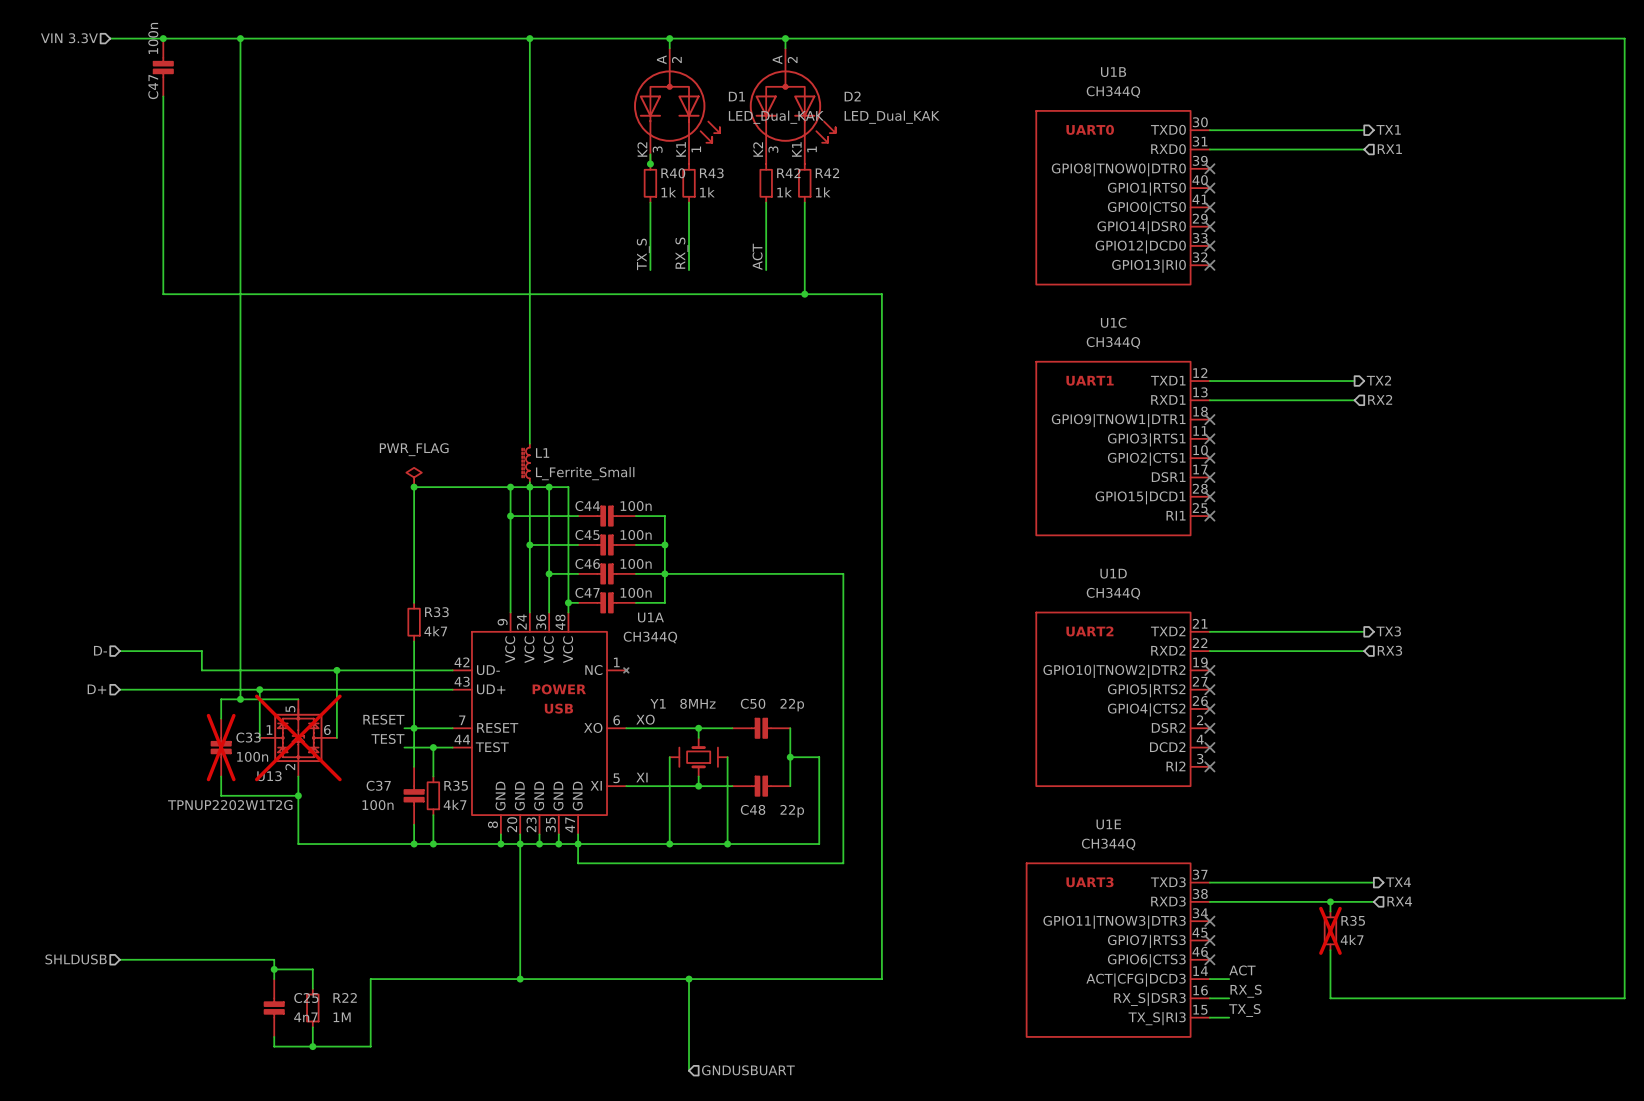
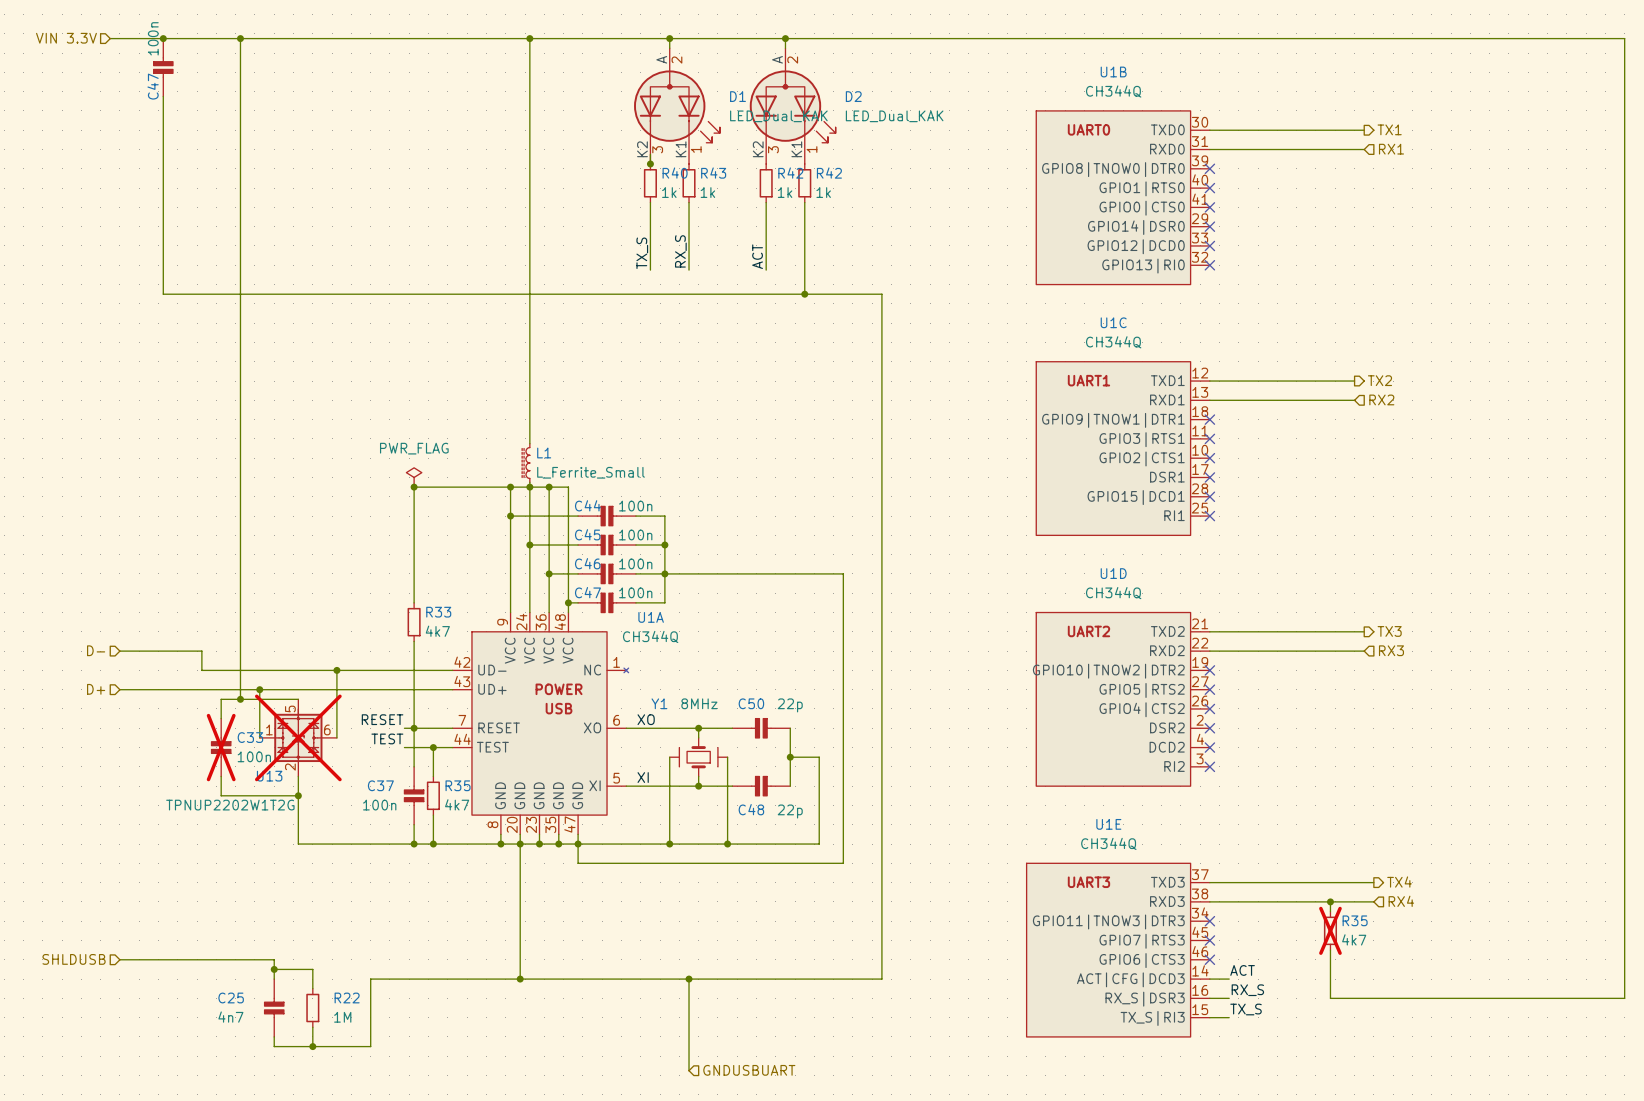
C25 name position: C25 (306, 998) -> C25 (231, 998)
C25 value position: 4n7 (305, 1017) -> 4n7 (230, 1017)

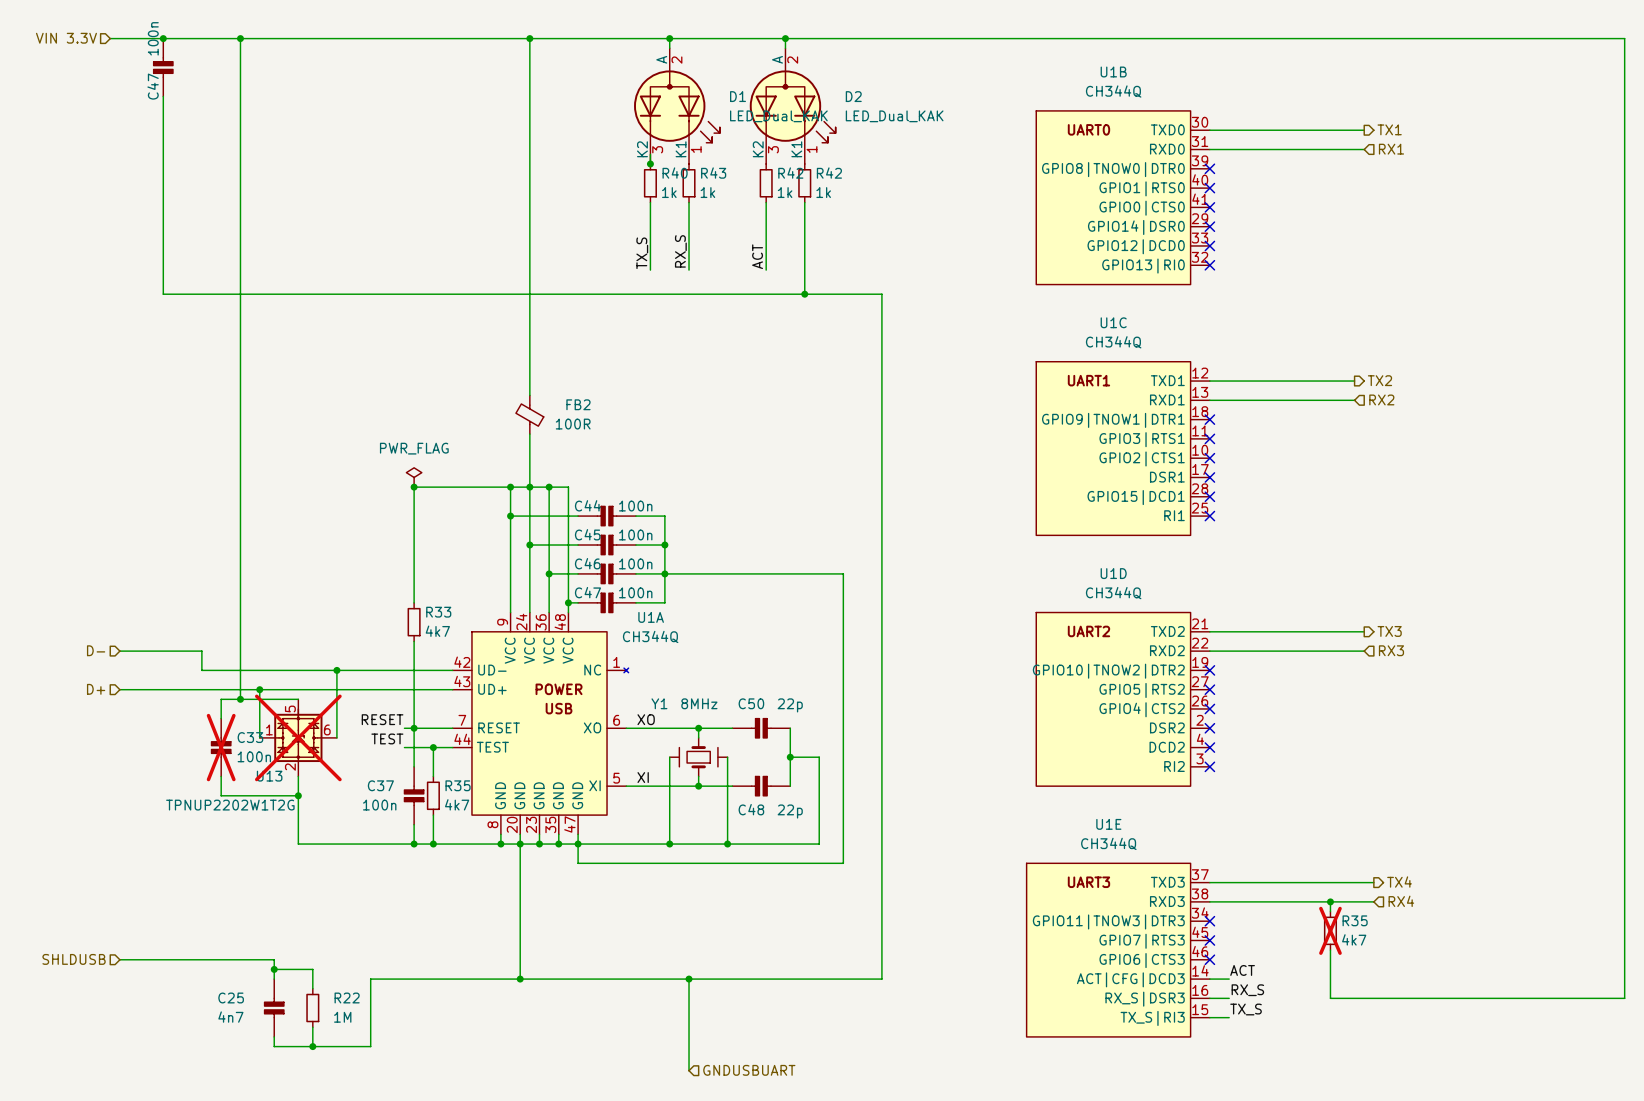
FB2: none -> 100R (529, 414)
L1: L_Ferrite_Small (525, 463) -> none

